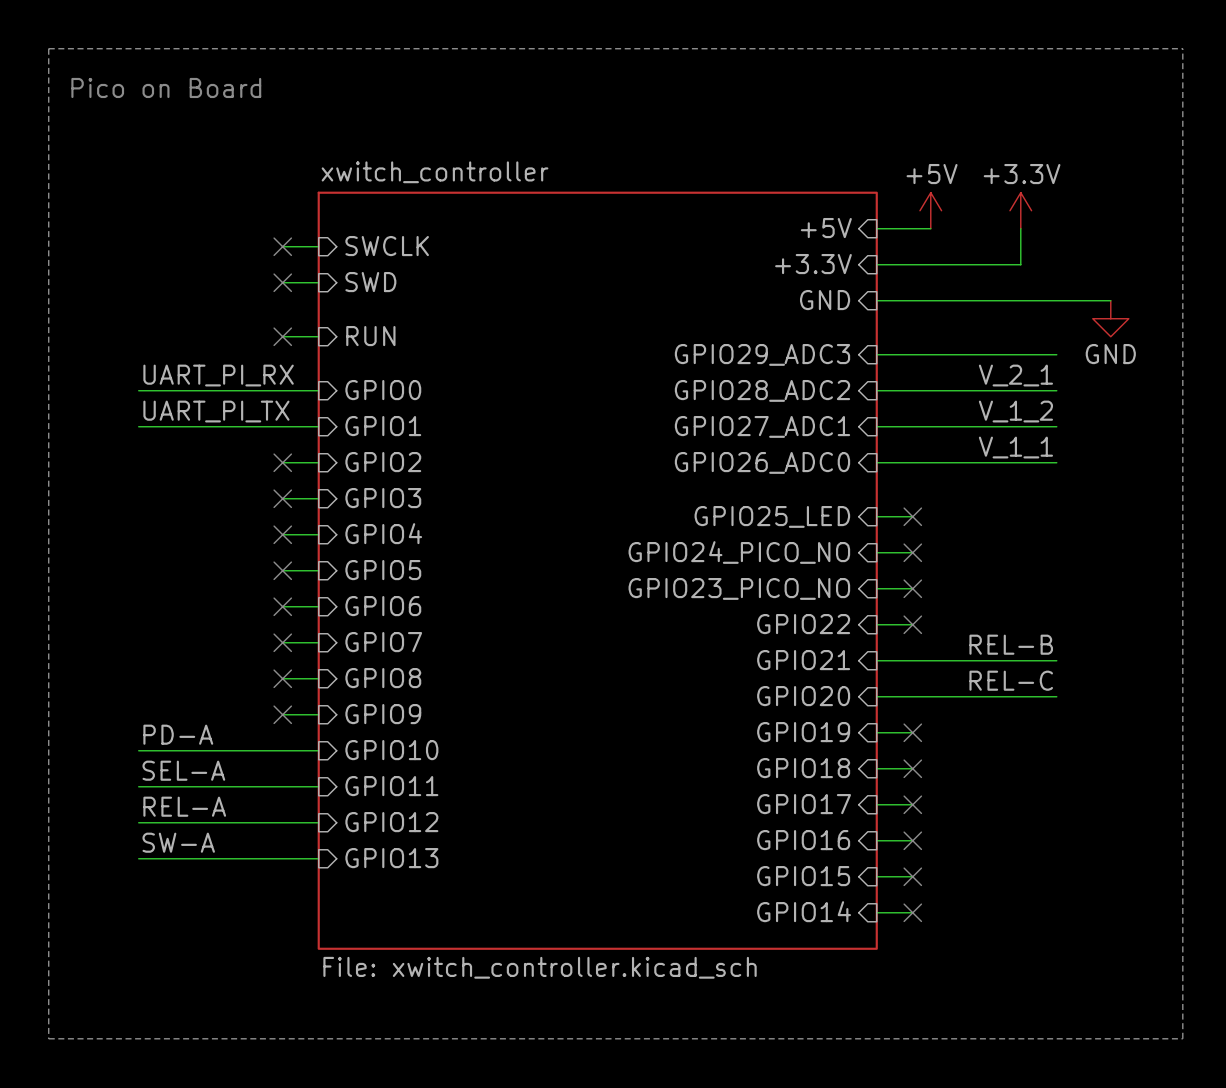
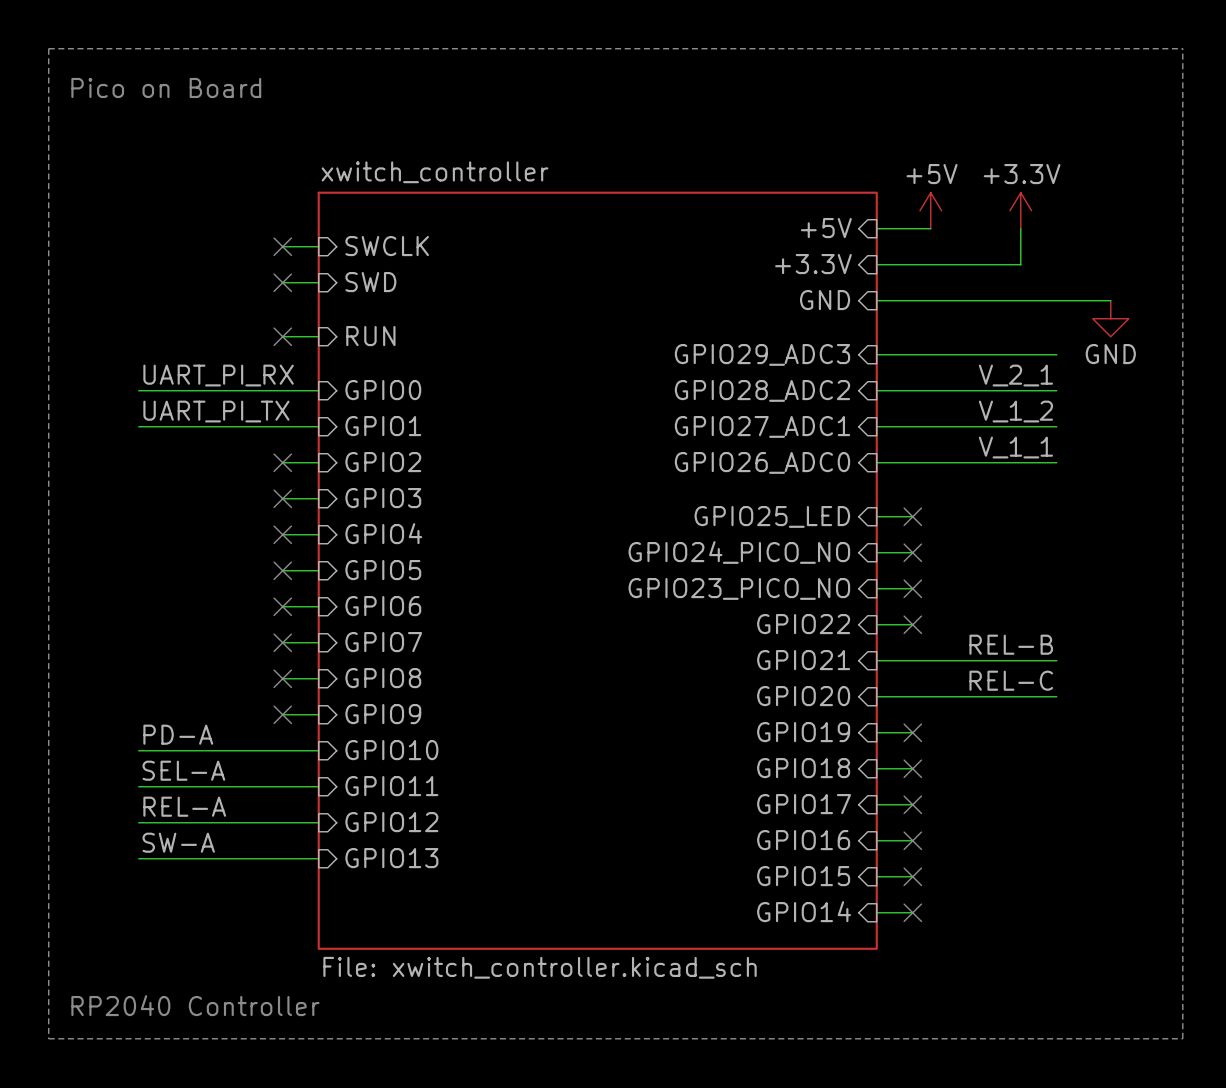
text: none -> RP2040 Controller (195, 1005)

